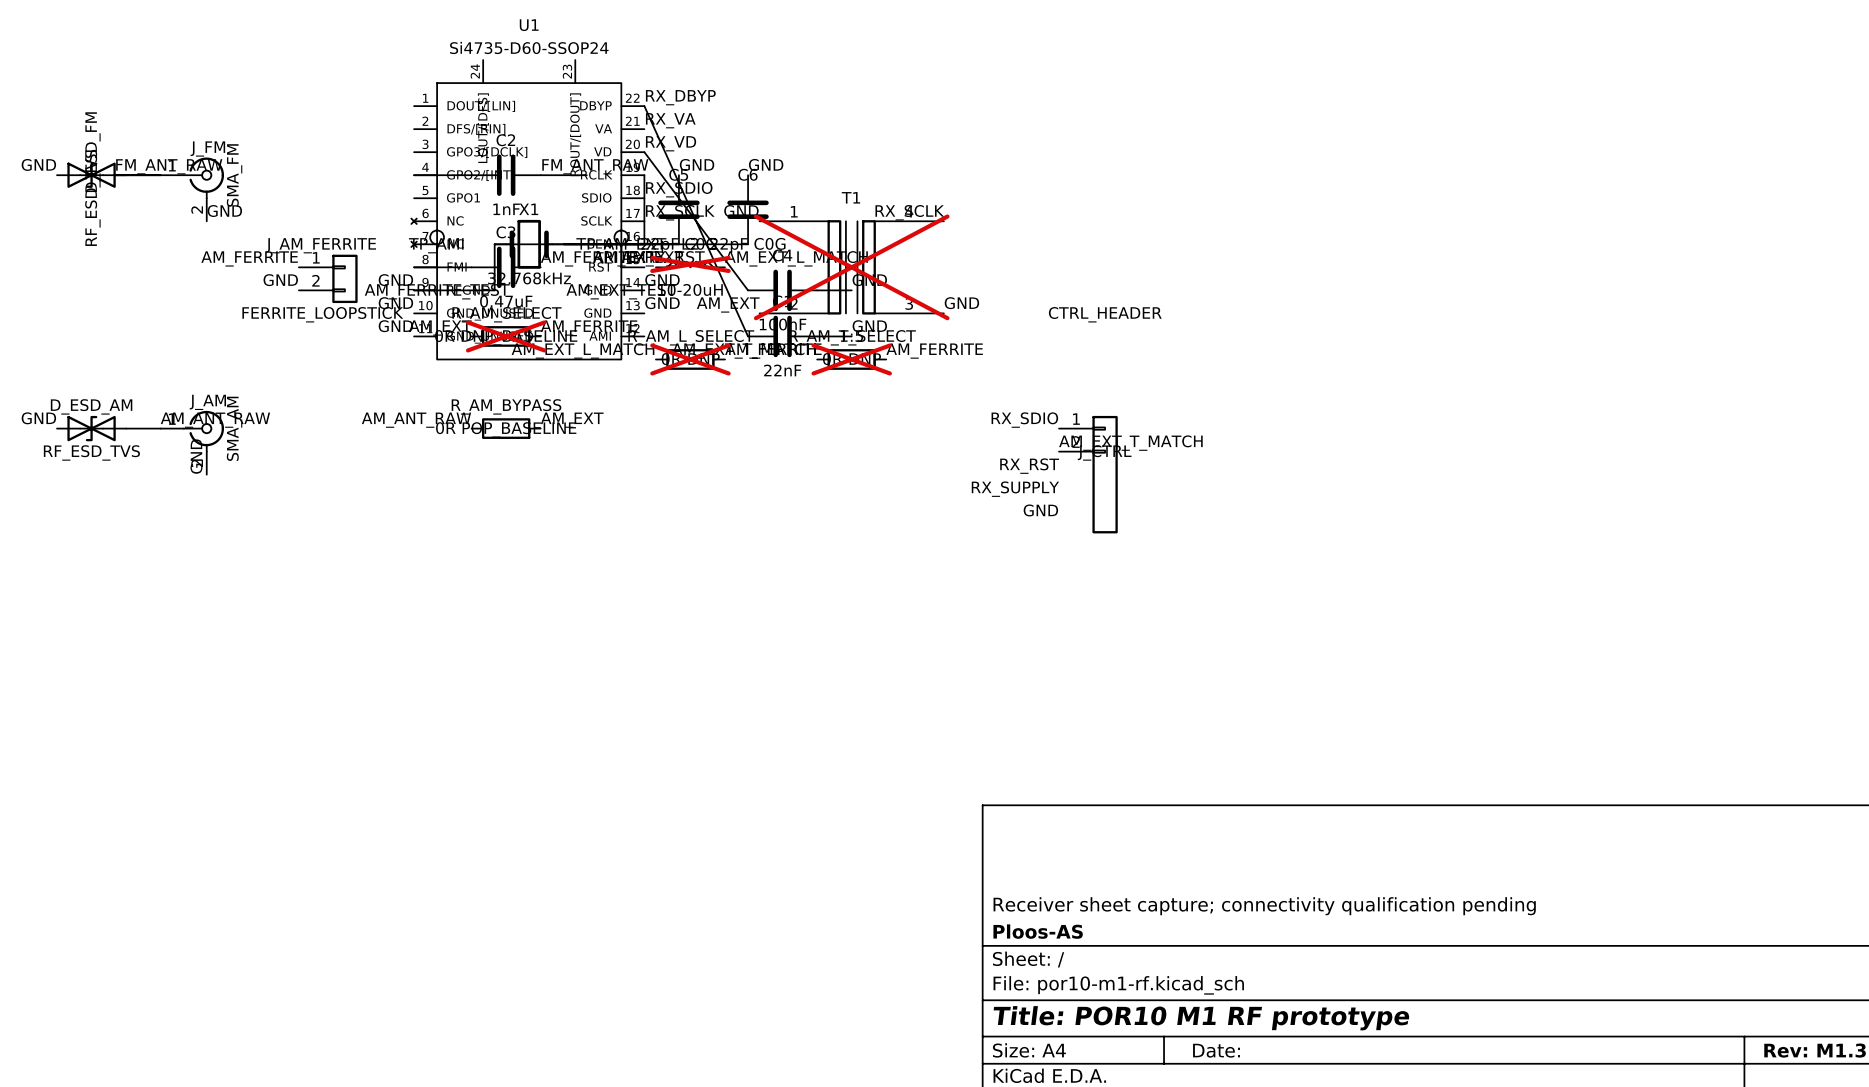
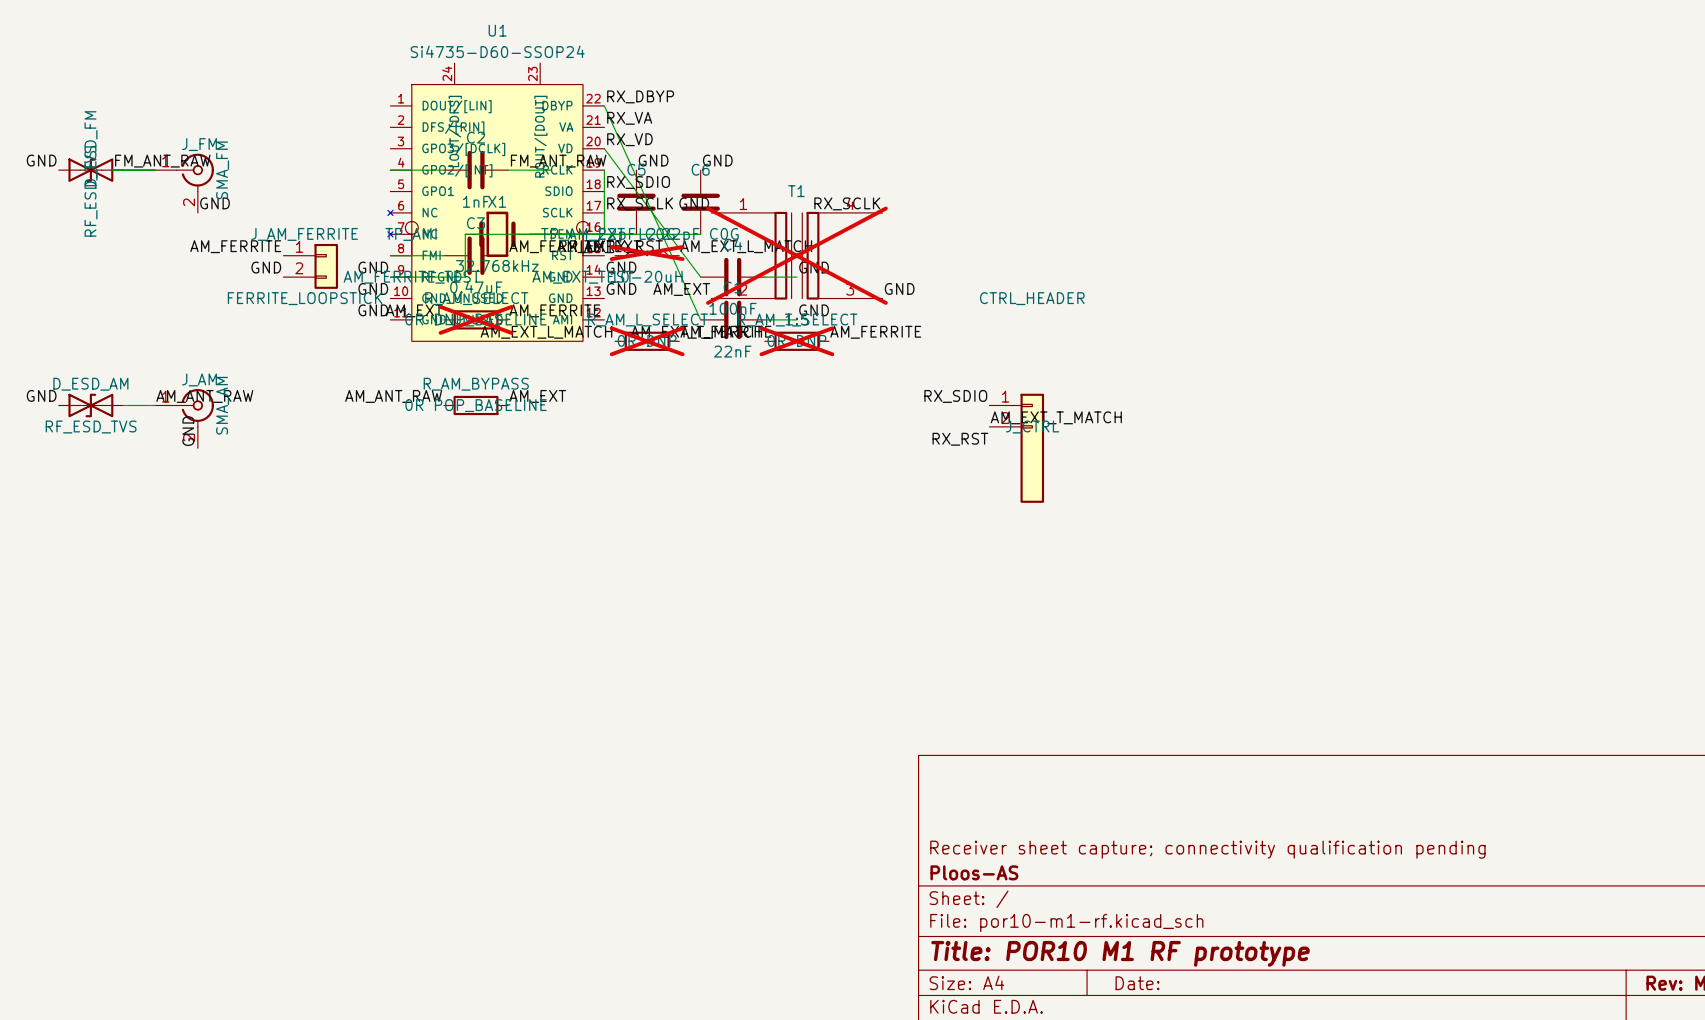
label: RX_SUPPLY (1015, 489) -> none
label: GND (1040, 510) -> none

